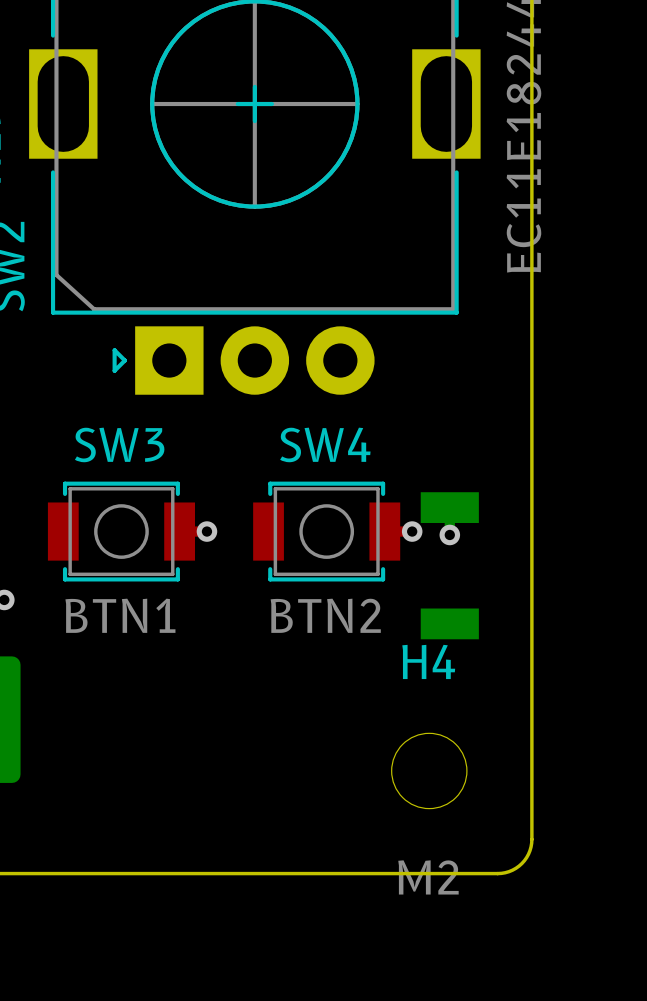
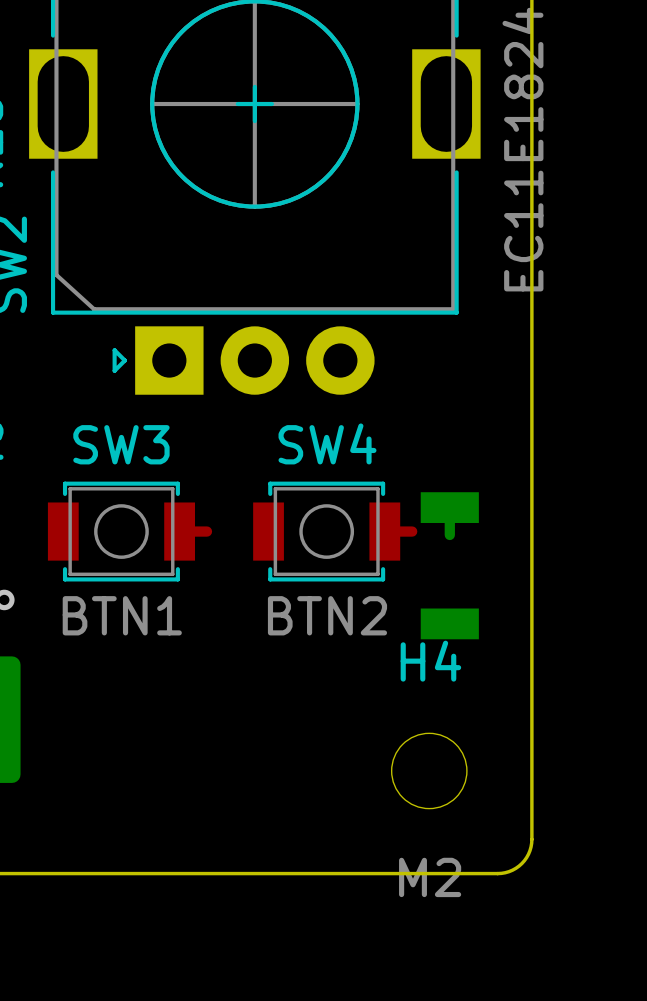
via: (206, 531) -> none
via: (412, 531) -> none
via: (449, 534) -> none

